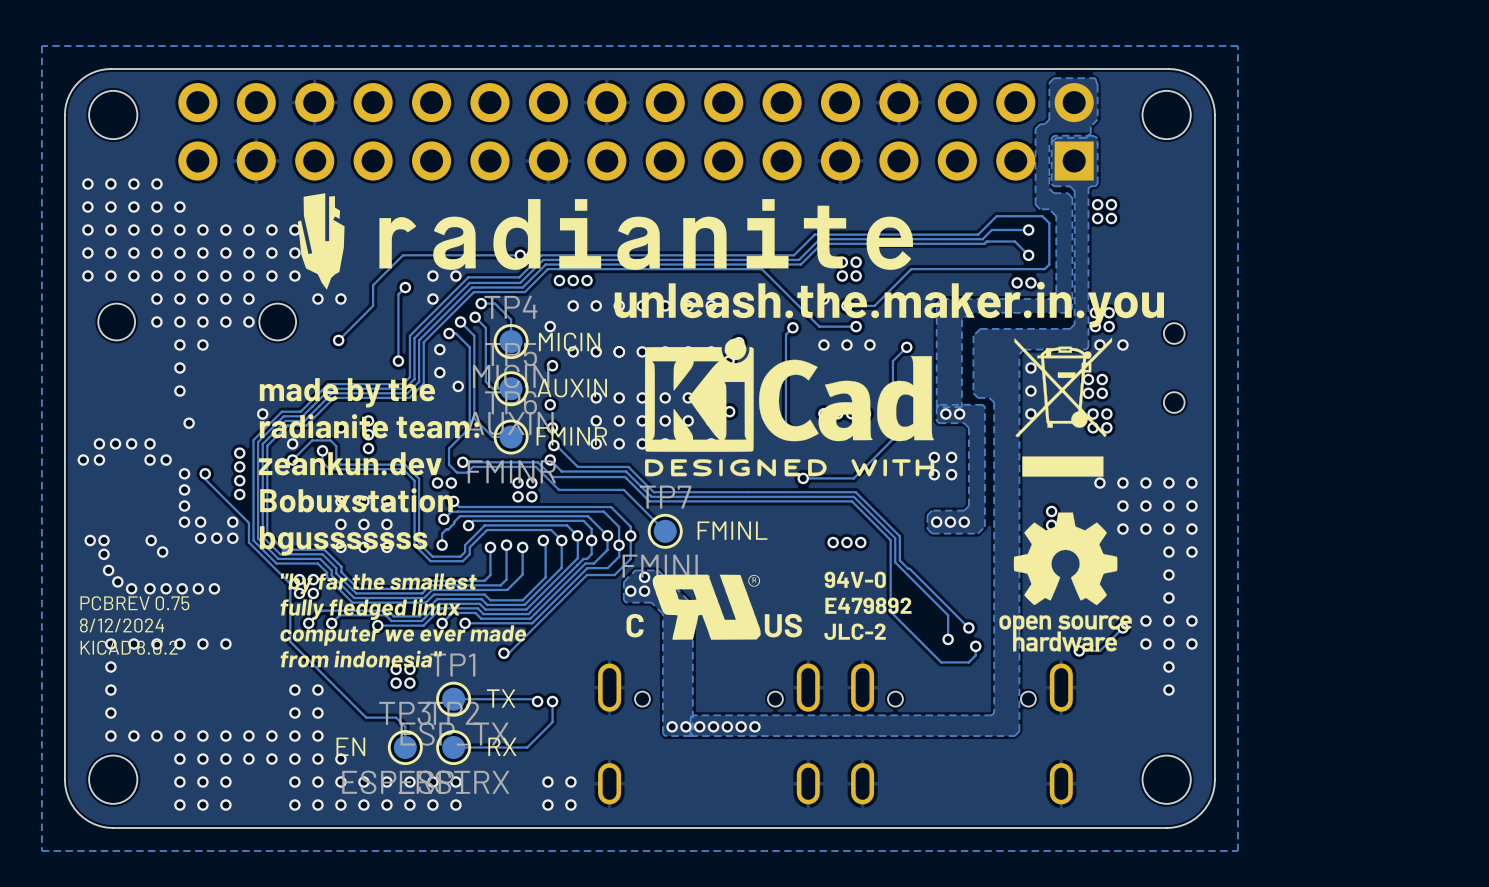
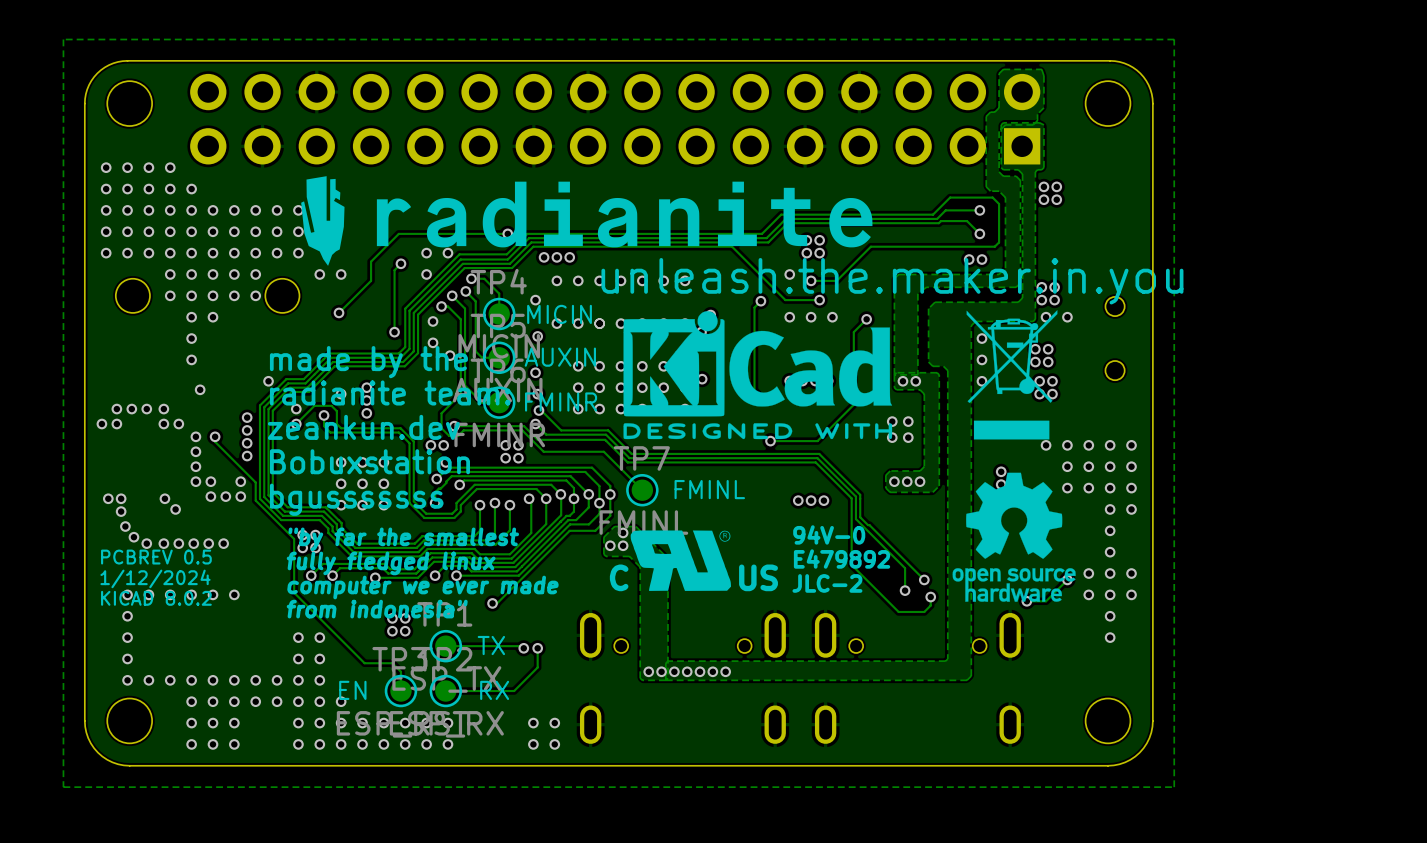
text: PCBREV 0.75 (134, 603) -> PCBREV 0.5 (156, 557)
text: 8/12/2024 (122, 625) -> 1/12/2024 (155, 578)

